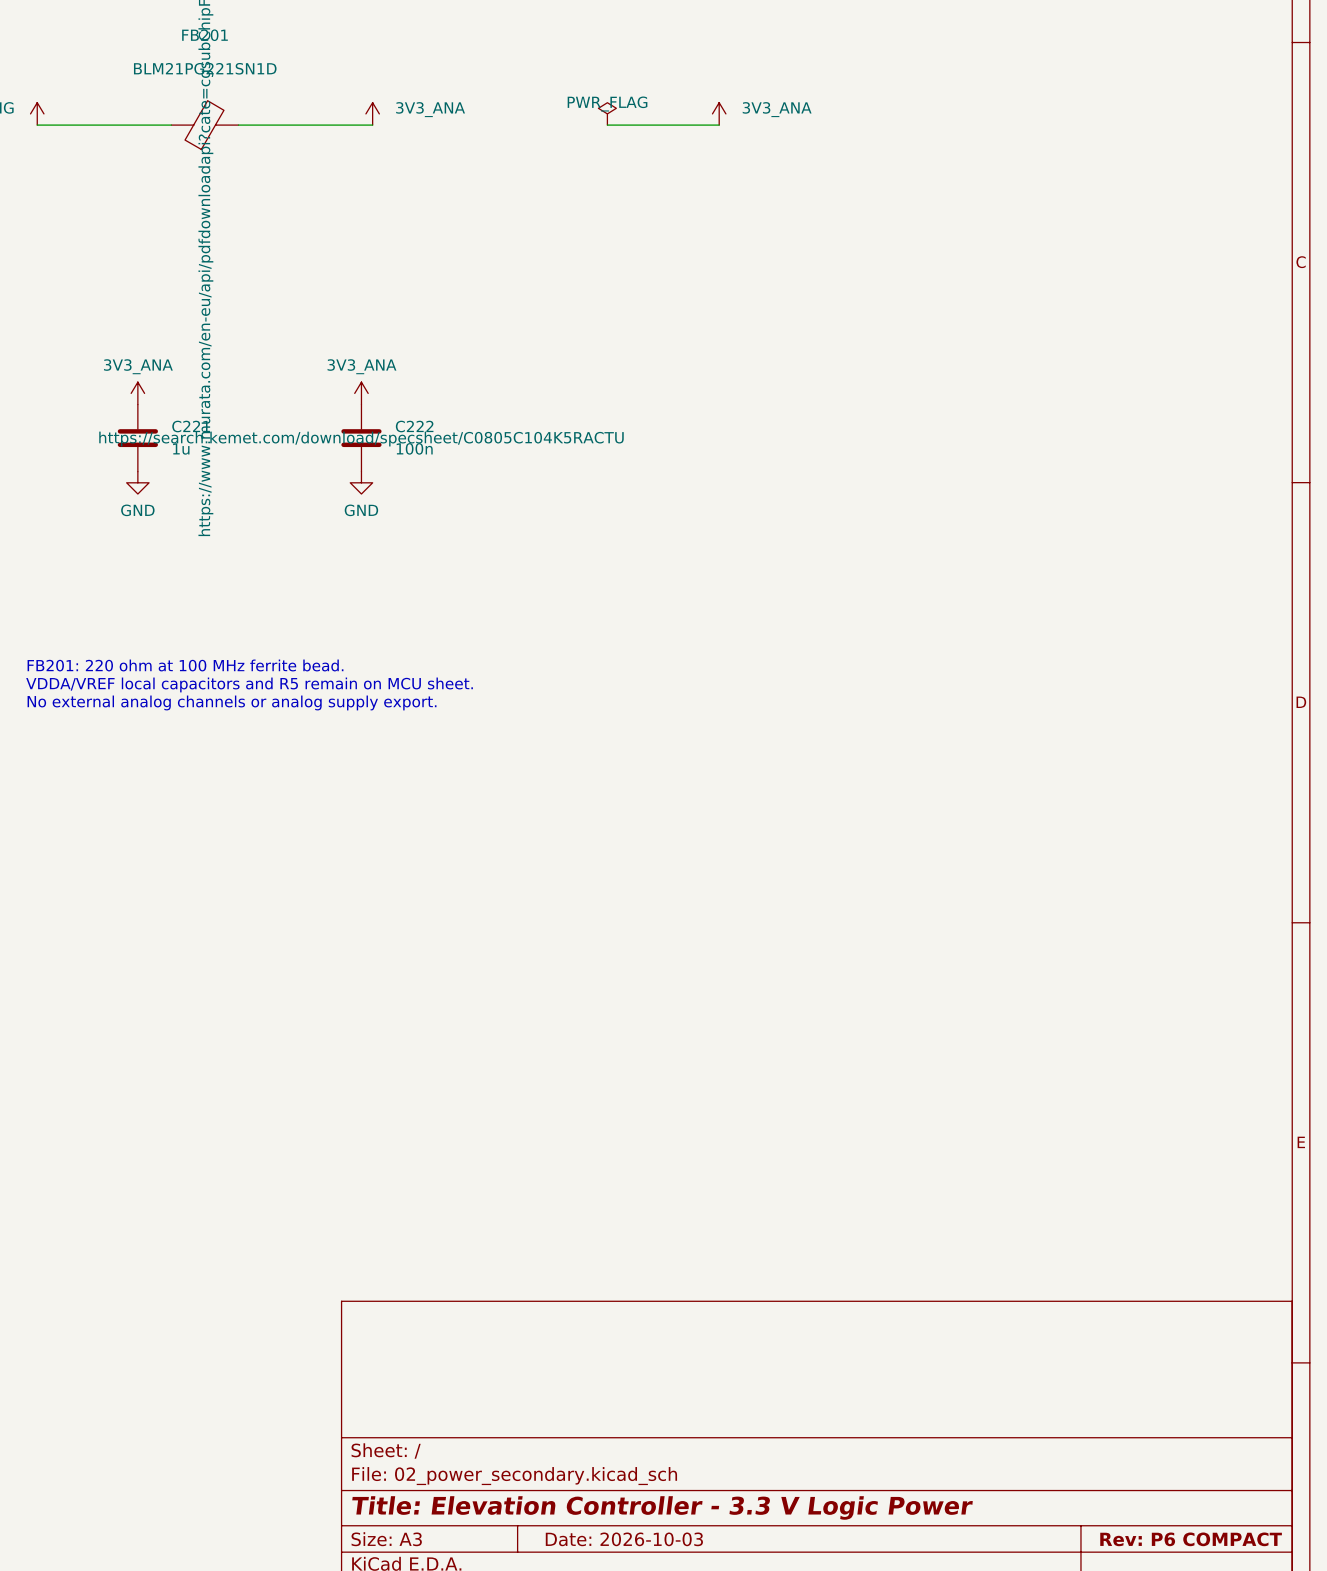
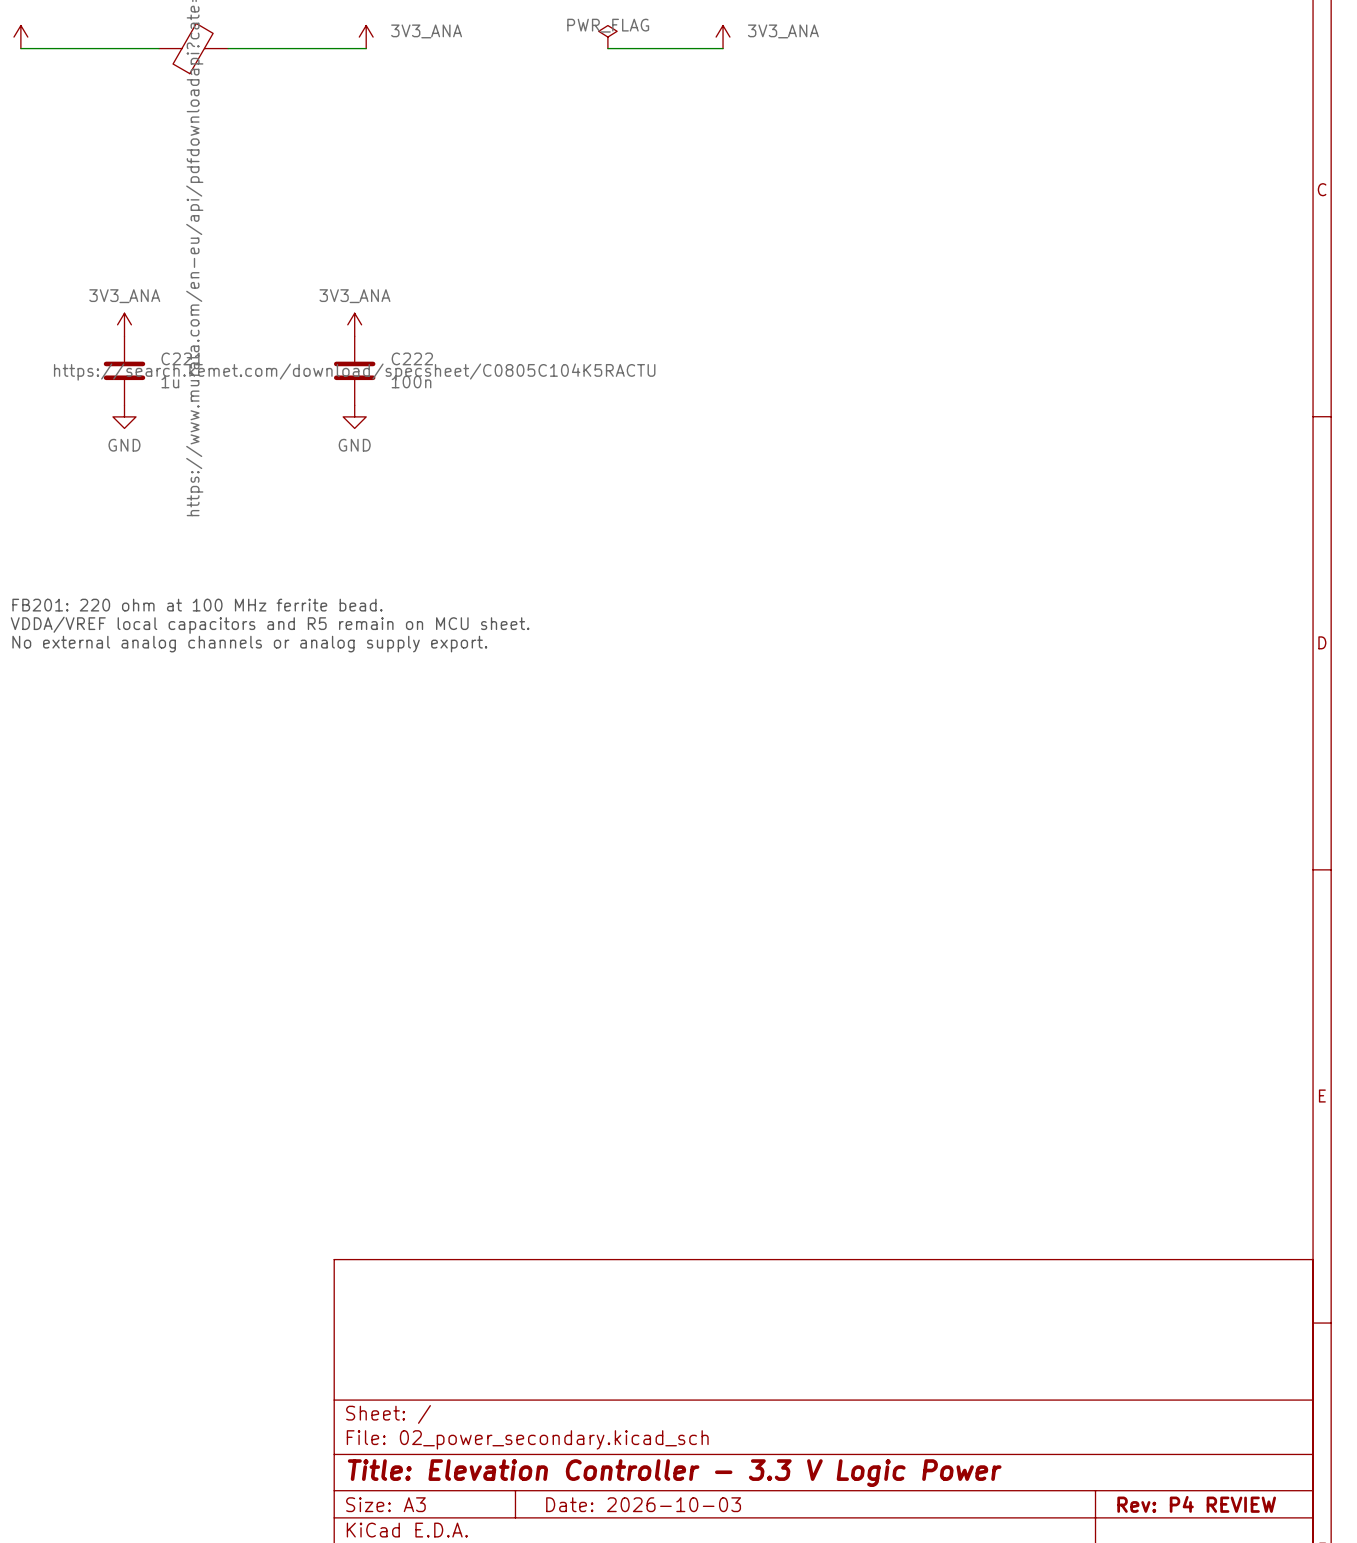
title block: Rev: P6 COMPACT (1191, 1539) -> Rev: P4 REVIEW (1196, 1504)

